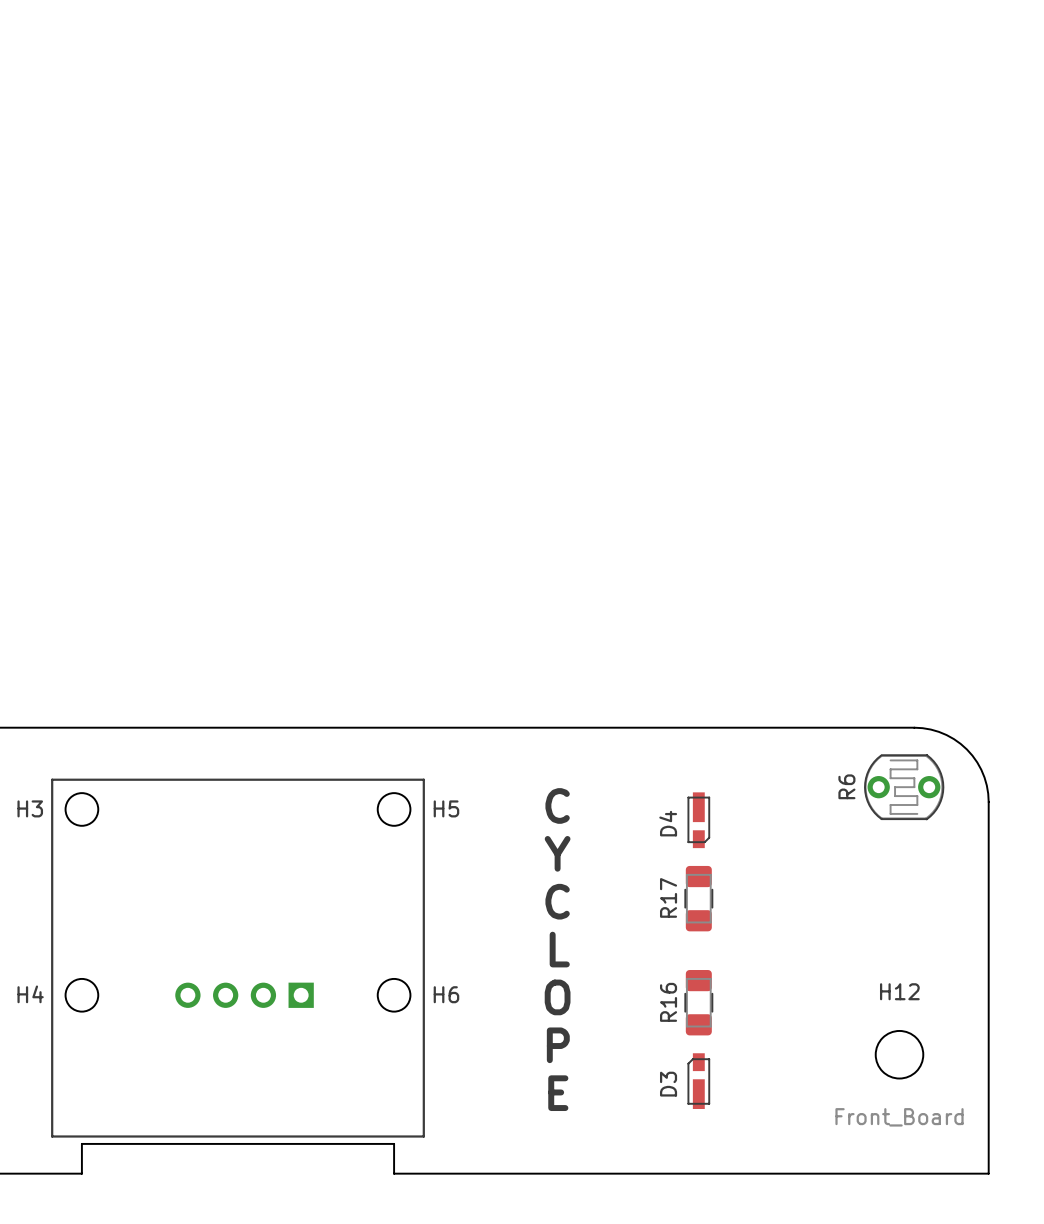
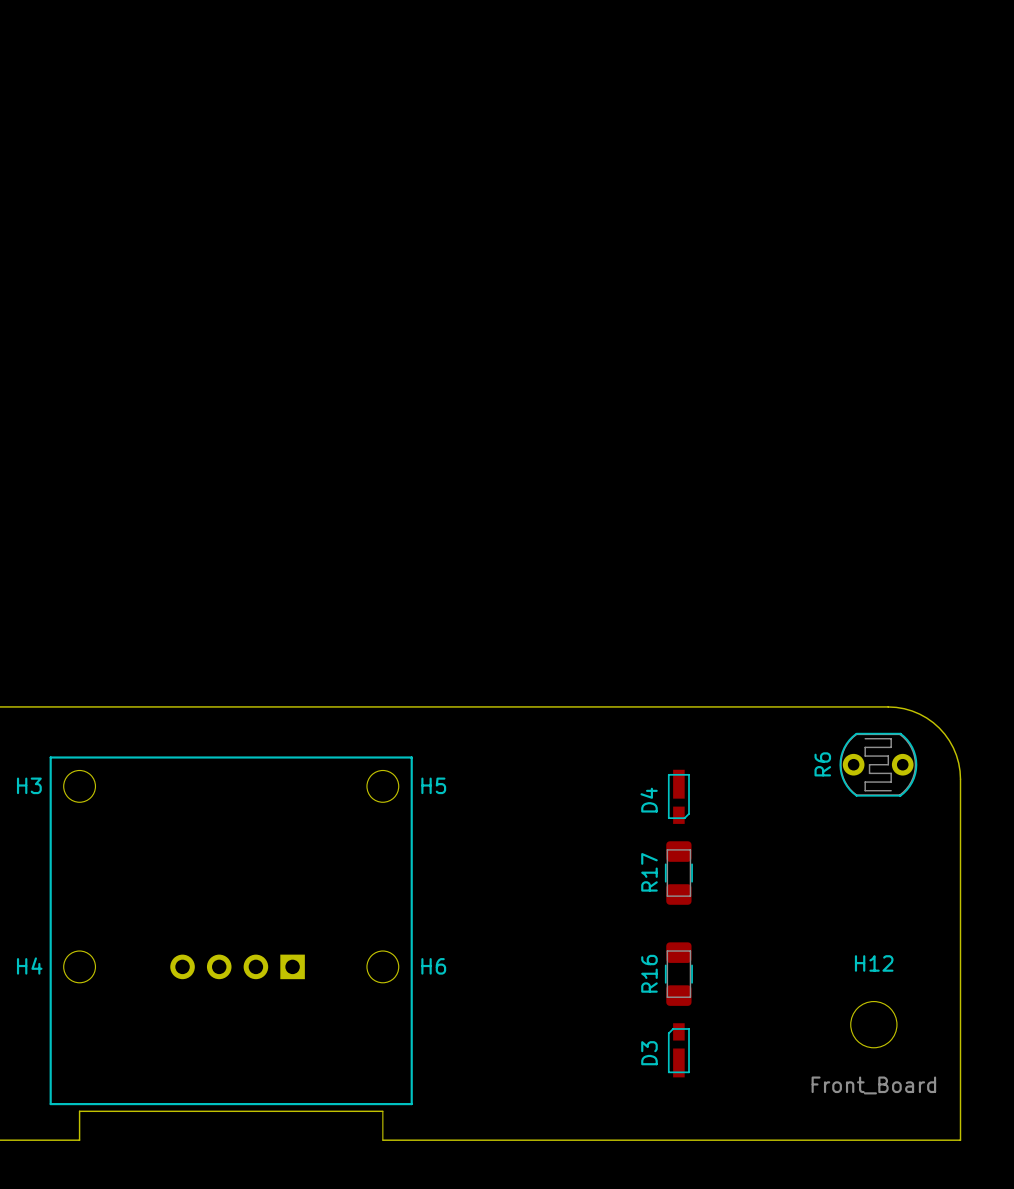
text: C (557, 805) -> none
text: Y (557, 853) -> none
text: C (557, 901) -> none
text: L (559, 949) -> none
text: O (557, 997) -> none
text: P (558, 1045) -> none
text: E (558, 1093) -> none

